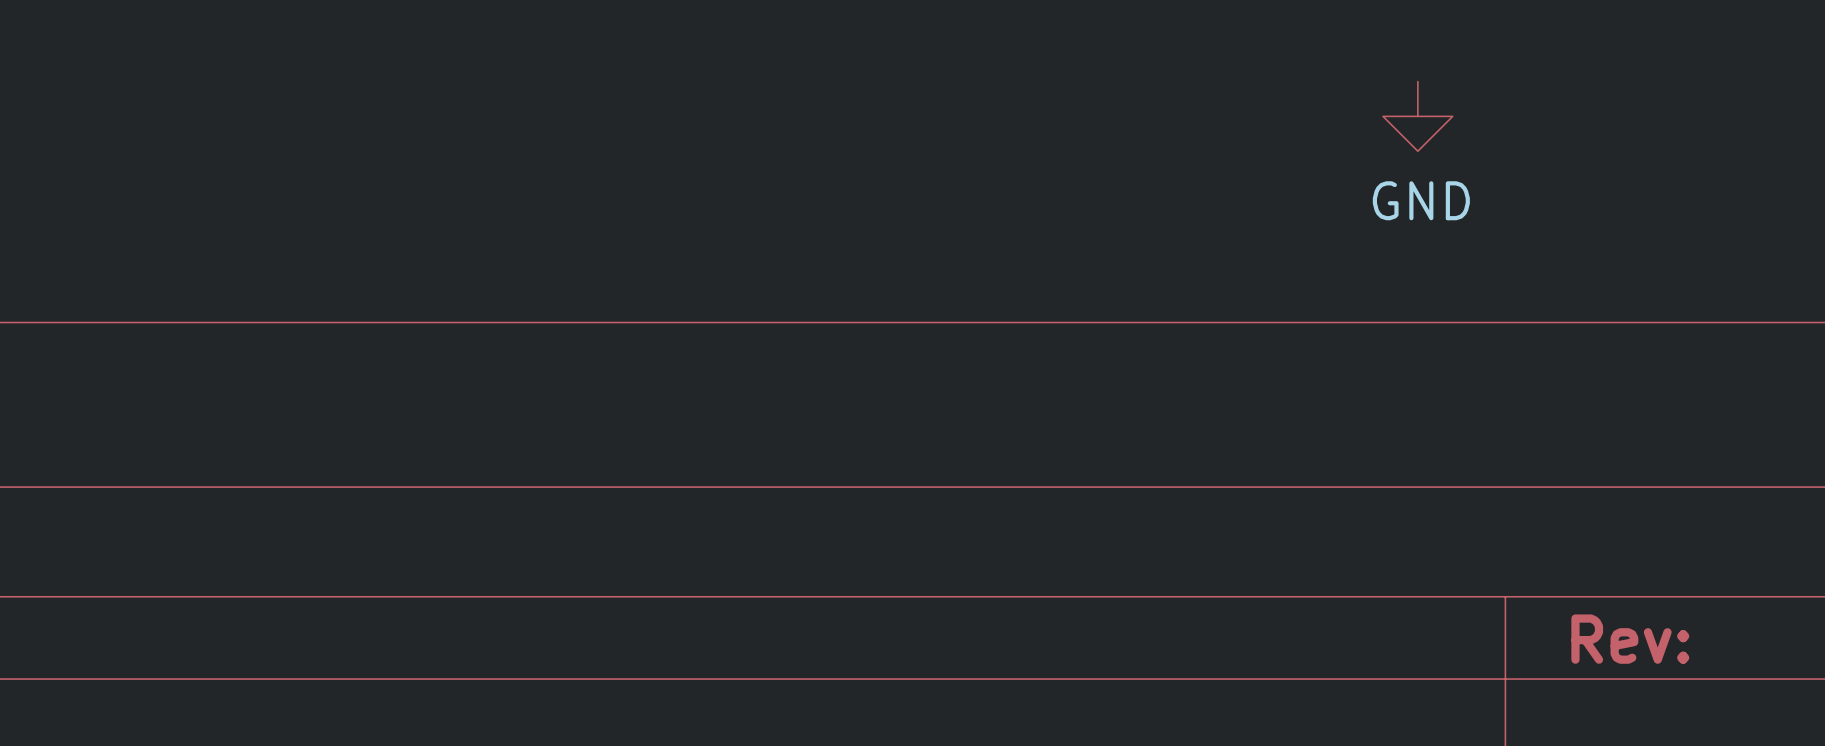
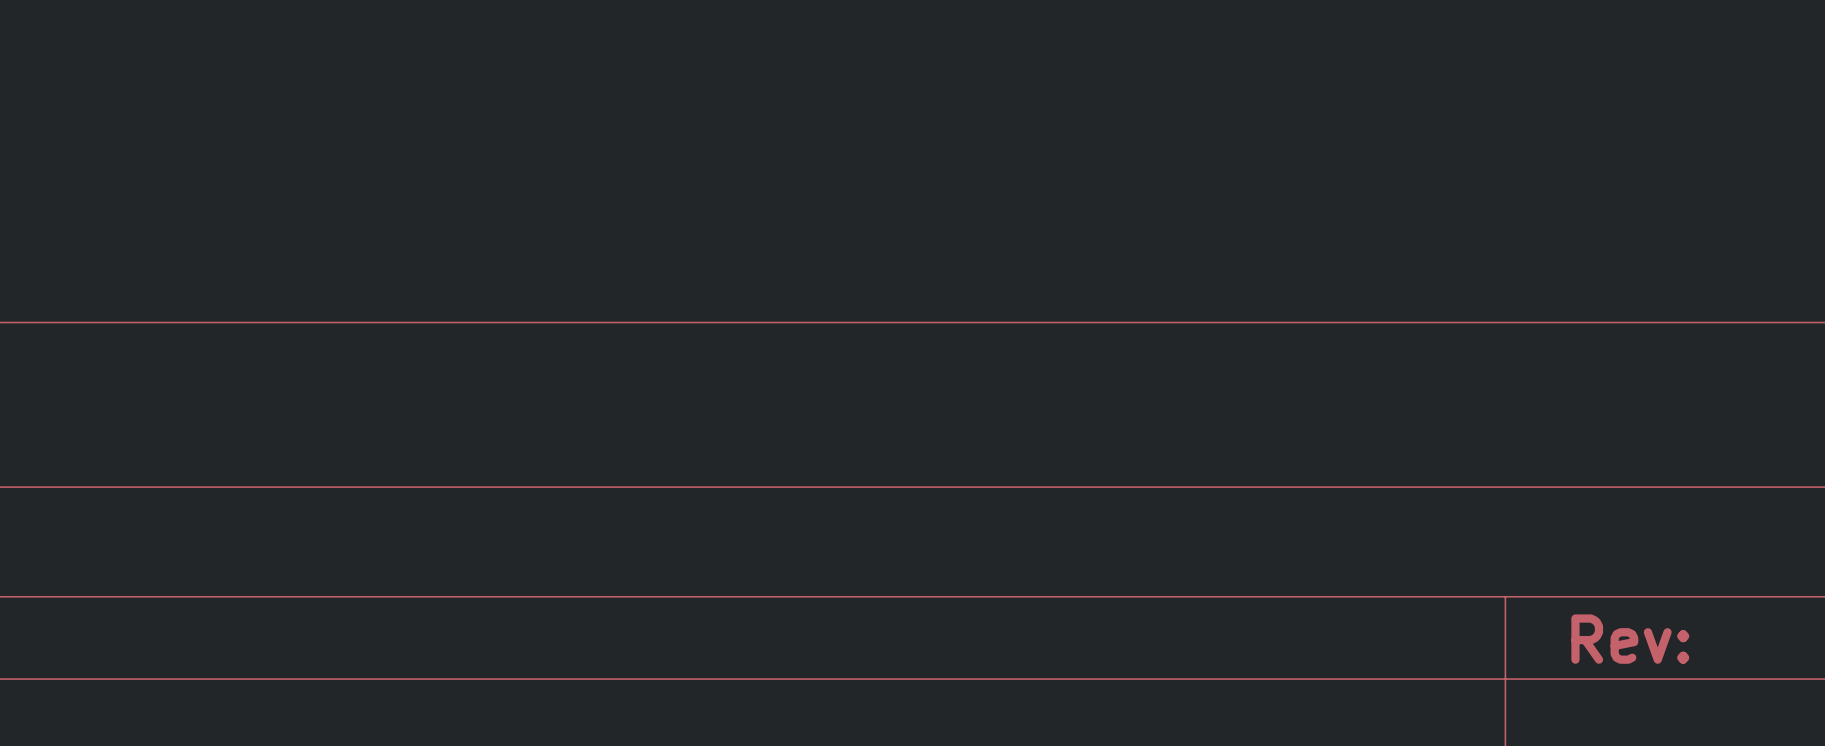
power symbol: GND (1417, 116) -> none

